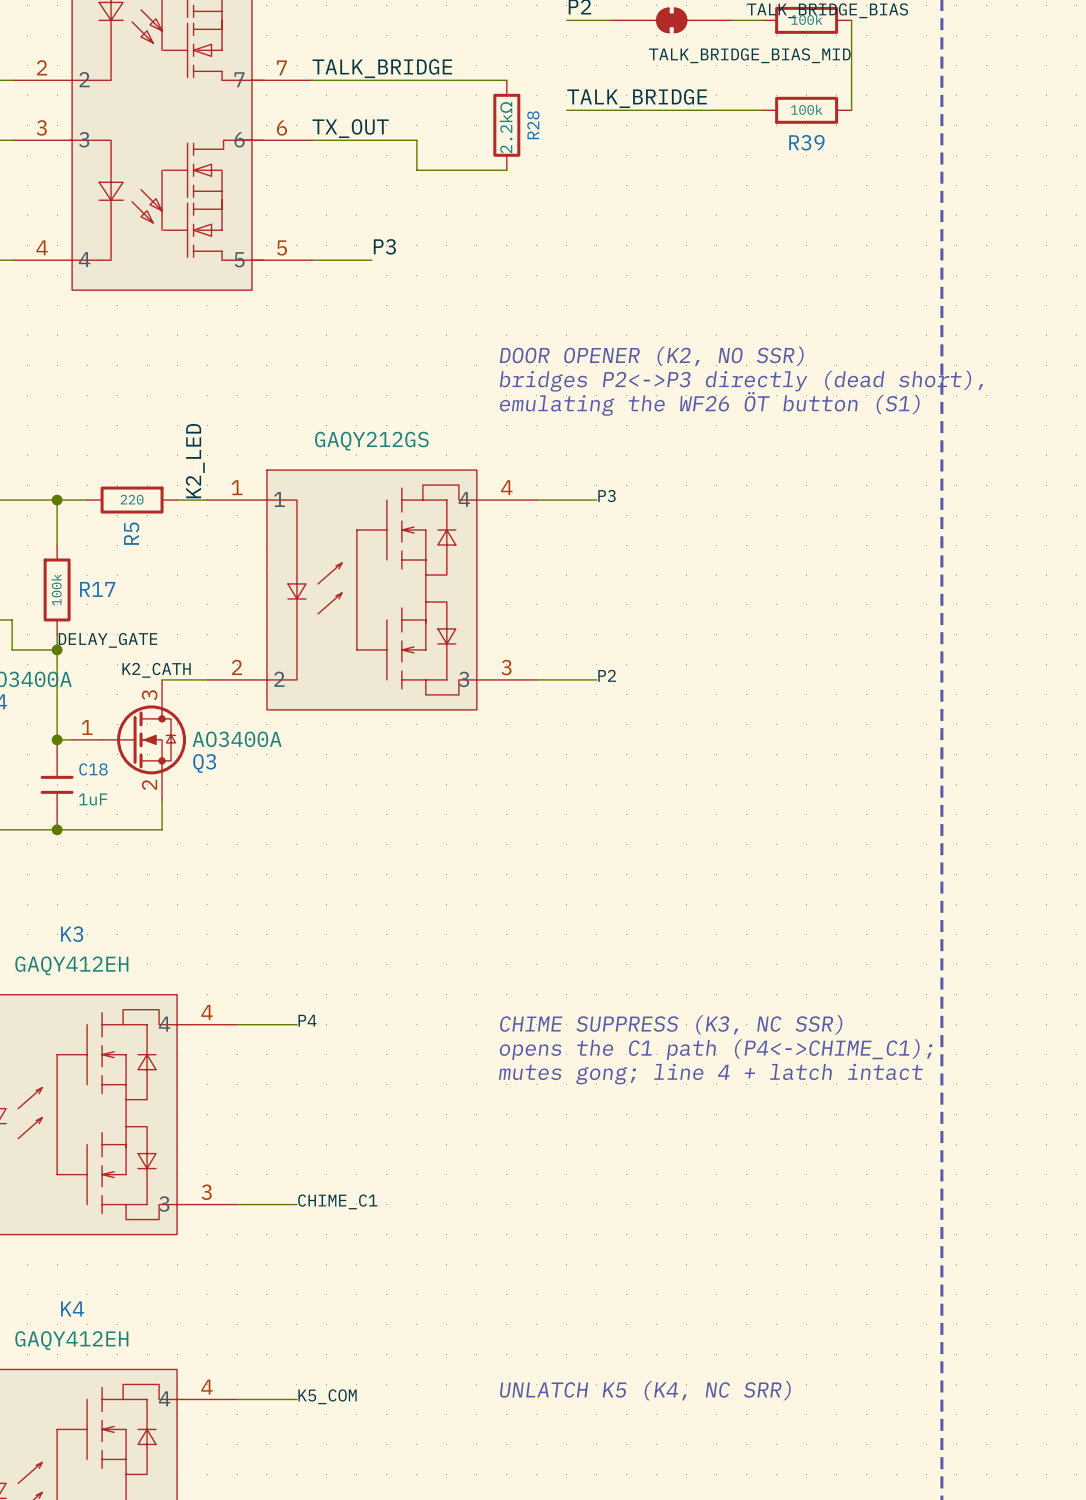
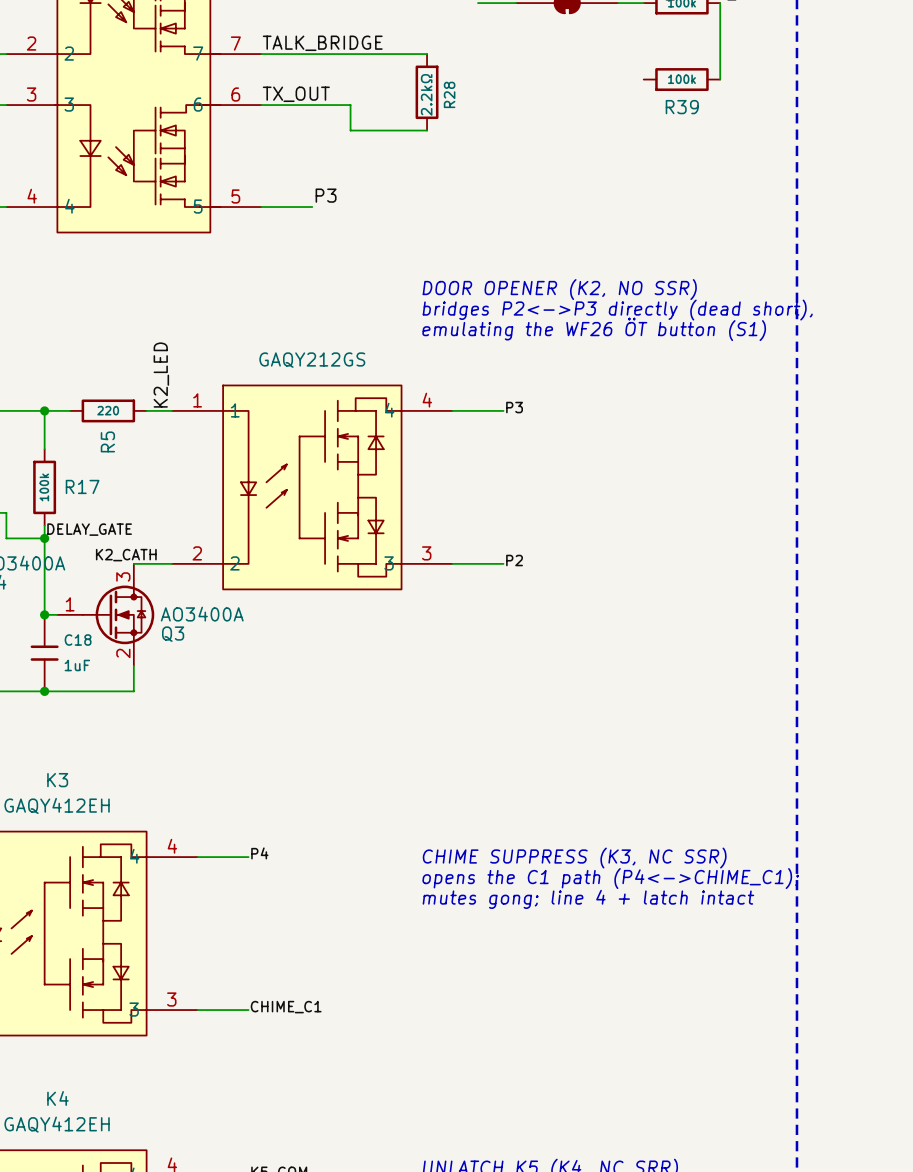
label: TALK_BRIDGE_BIAS_MID (749, 55) -> none
label: TALK_BRIDGE (637, 98) -> none
wire: (566, 110) (761, 110) -> none

